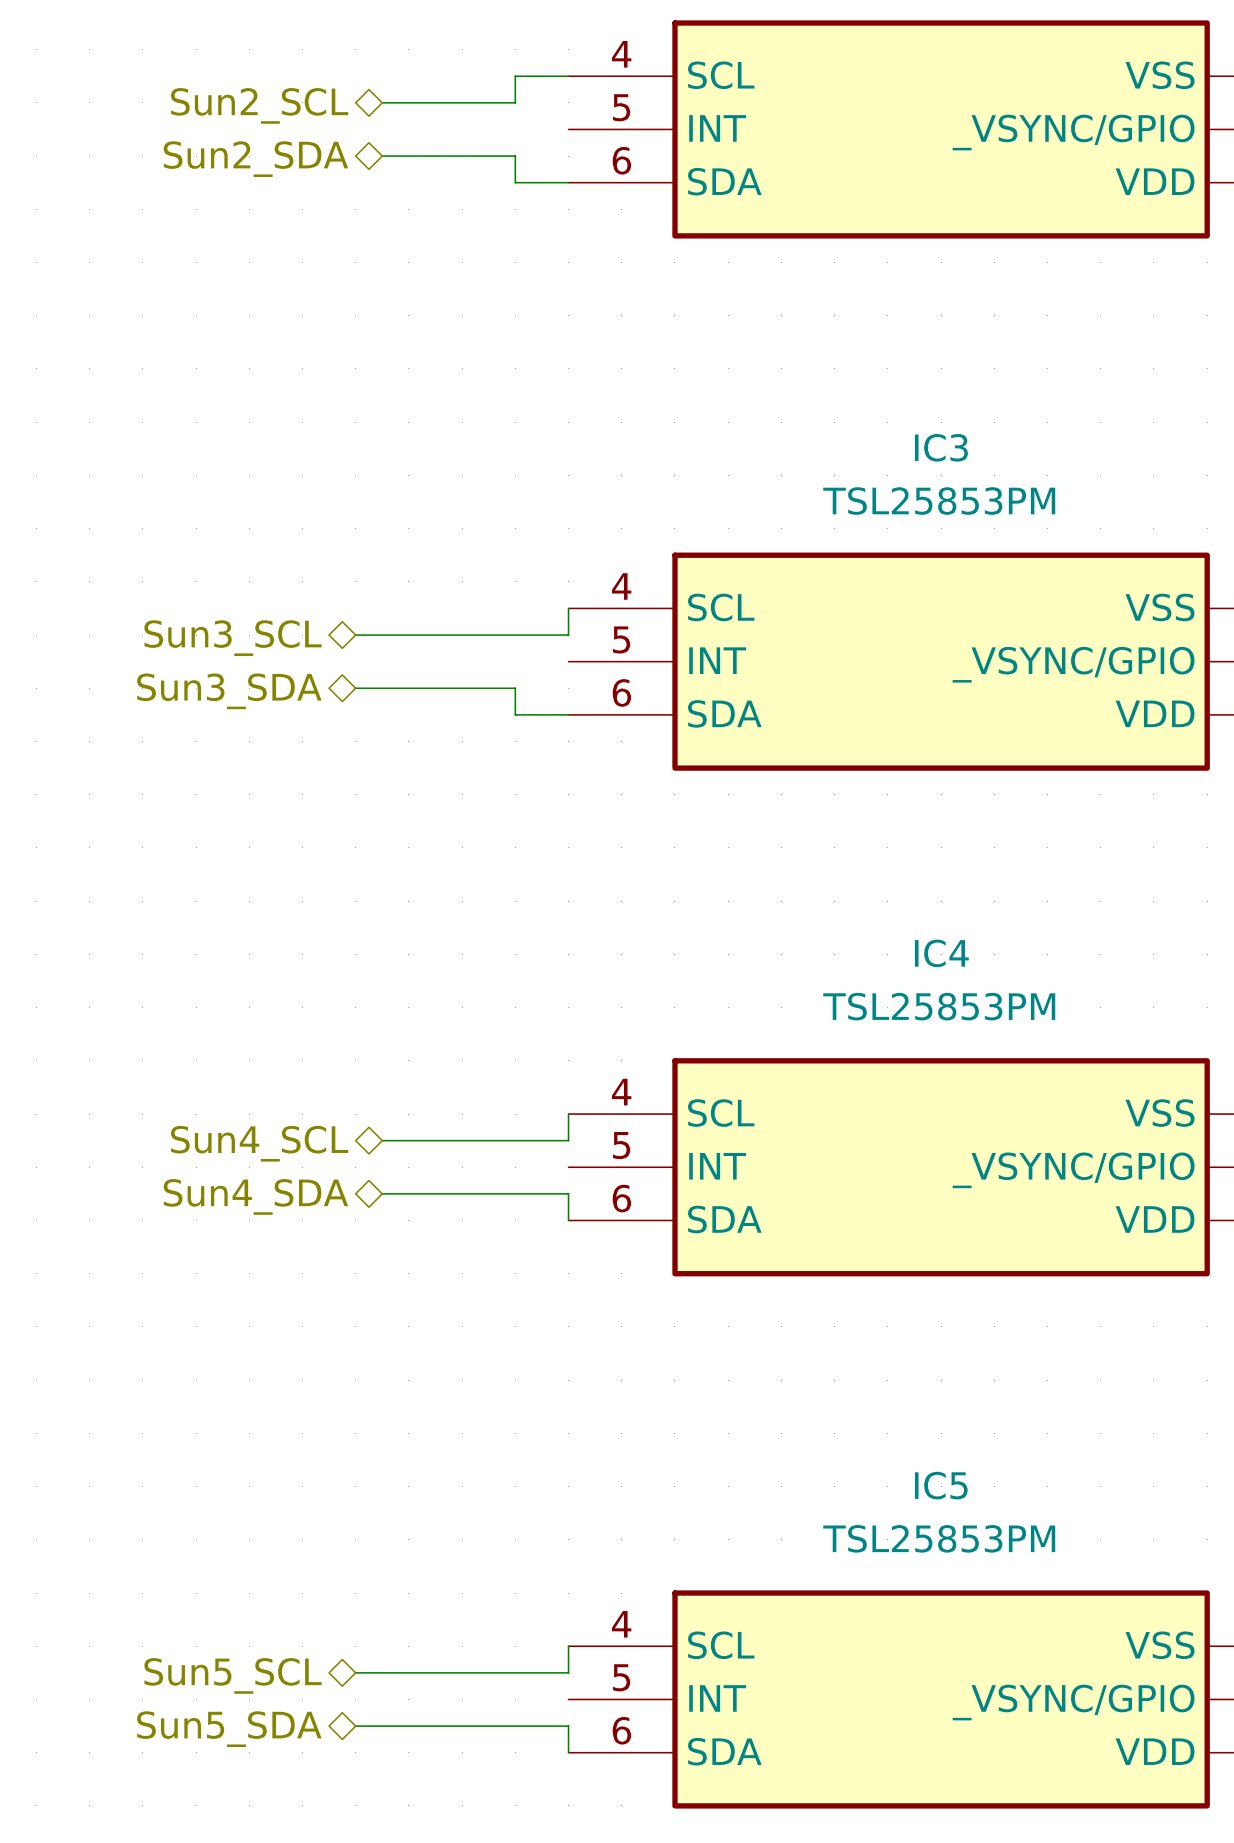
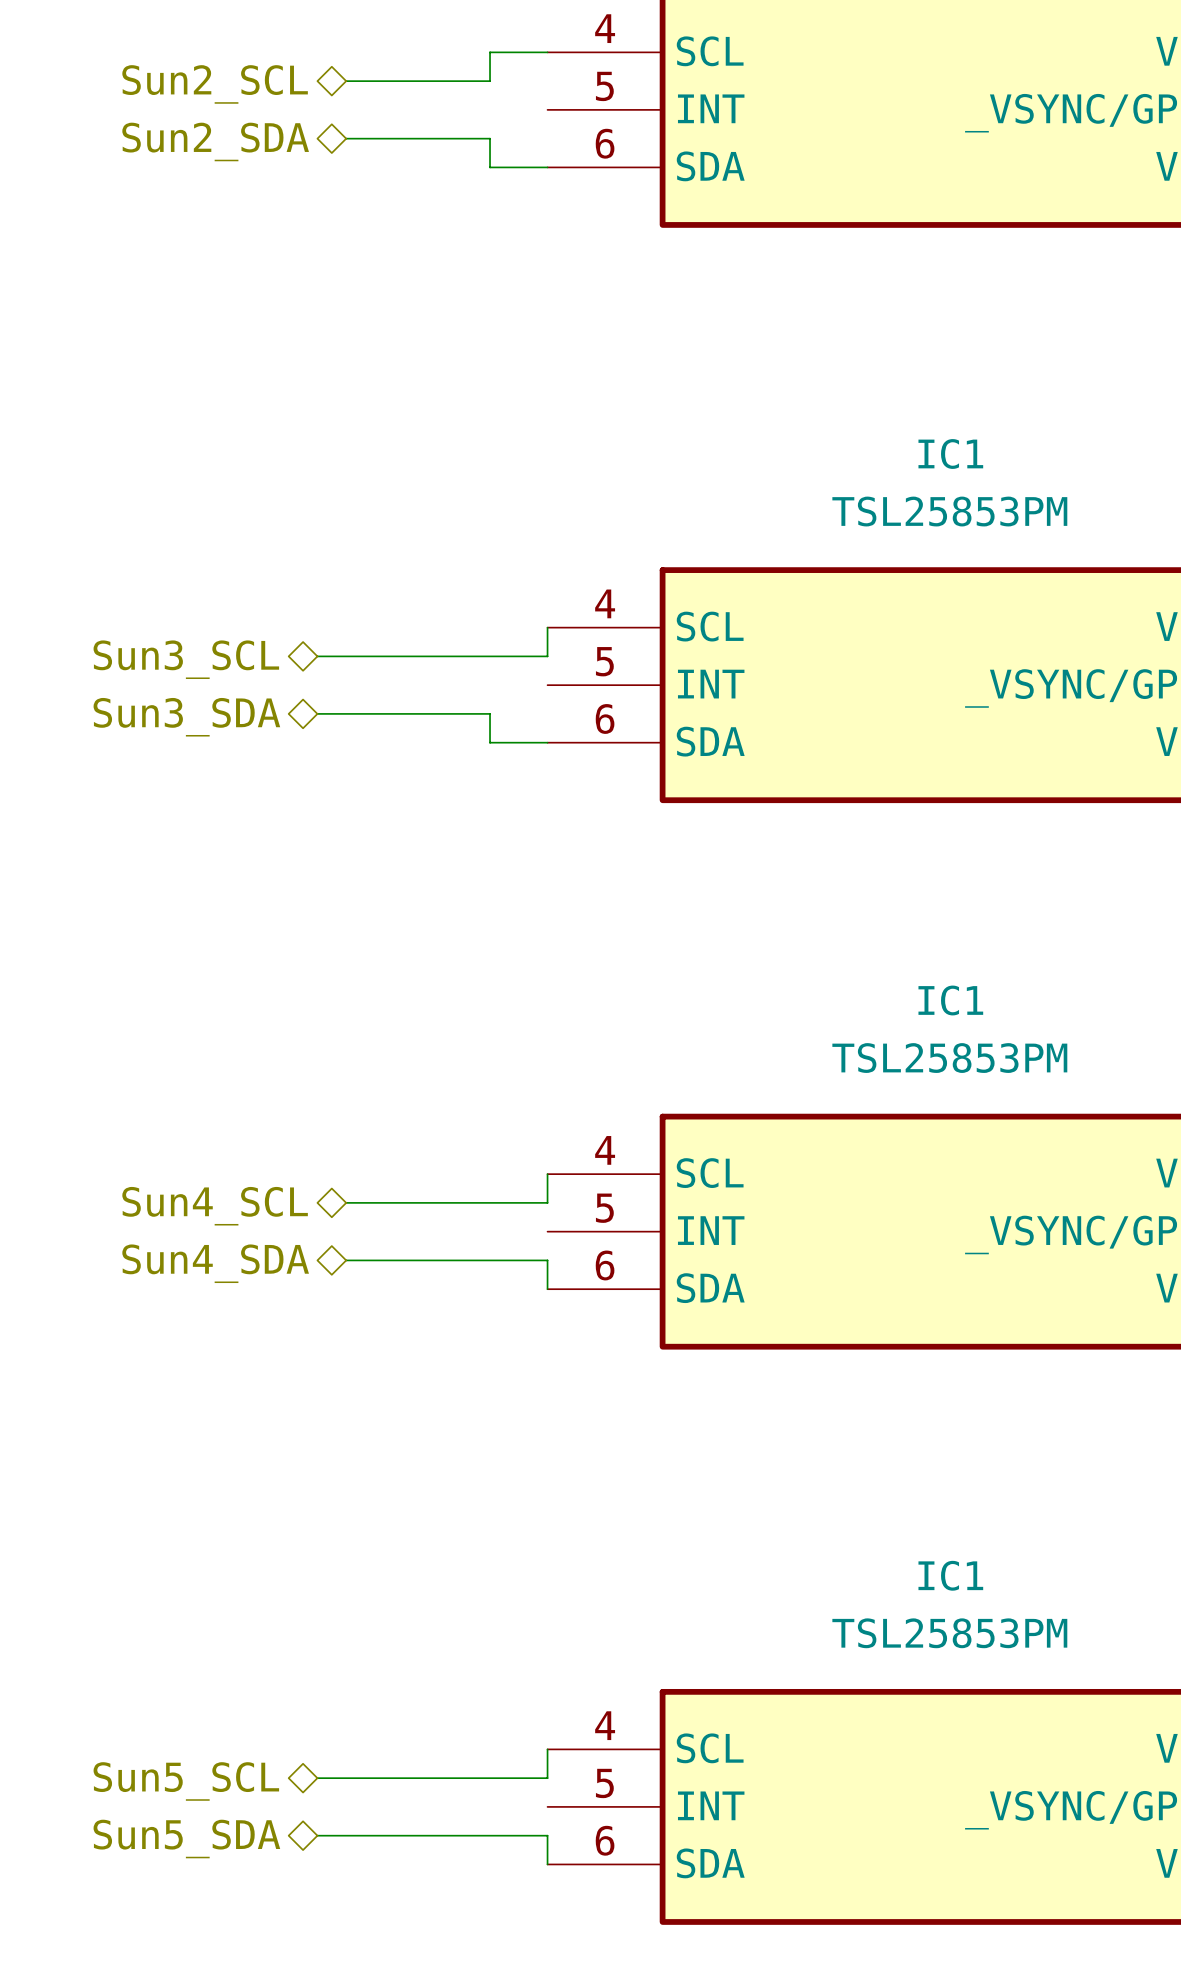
IC3 name: IC3 (941, 447) -> IC1 (950, 454)
IC4 name: IC4 (941, 953) -> IC1 (950, 1000)
IC5 name: IC5 (941, 1485) -> IC1 (950, 1575)

